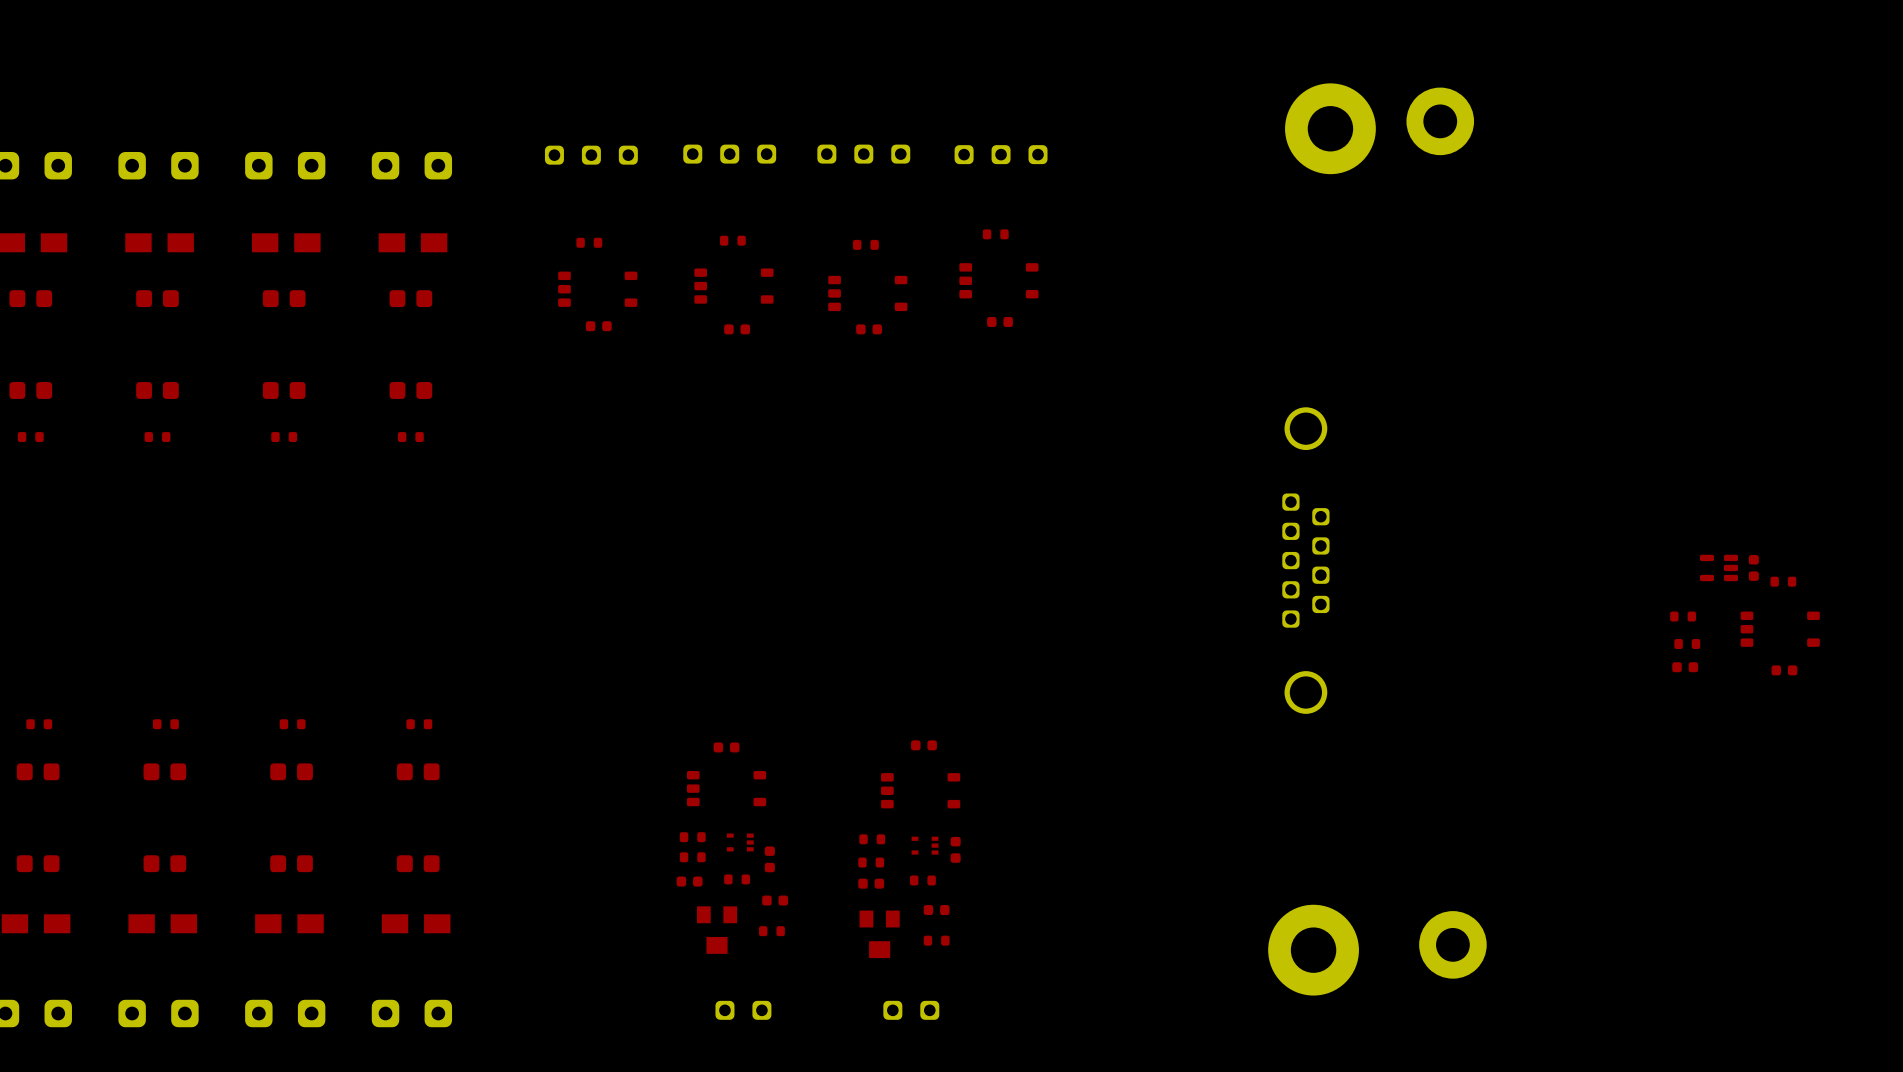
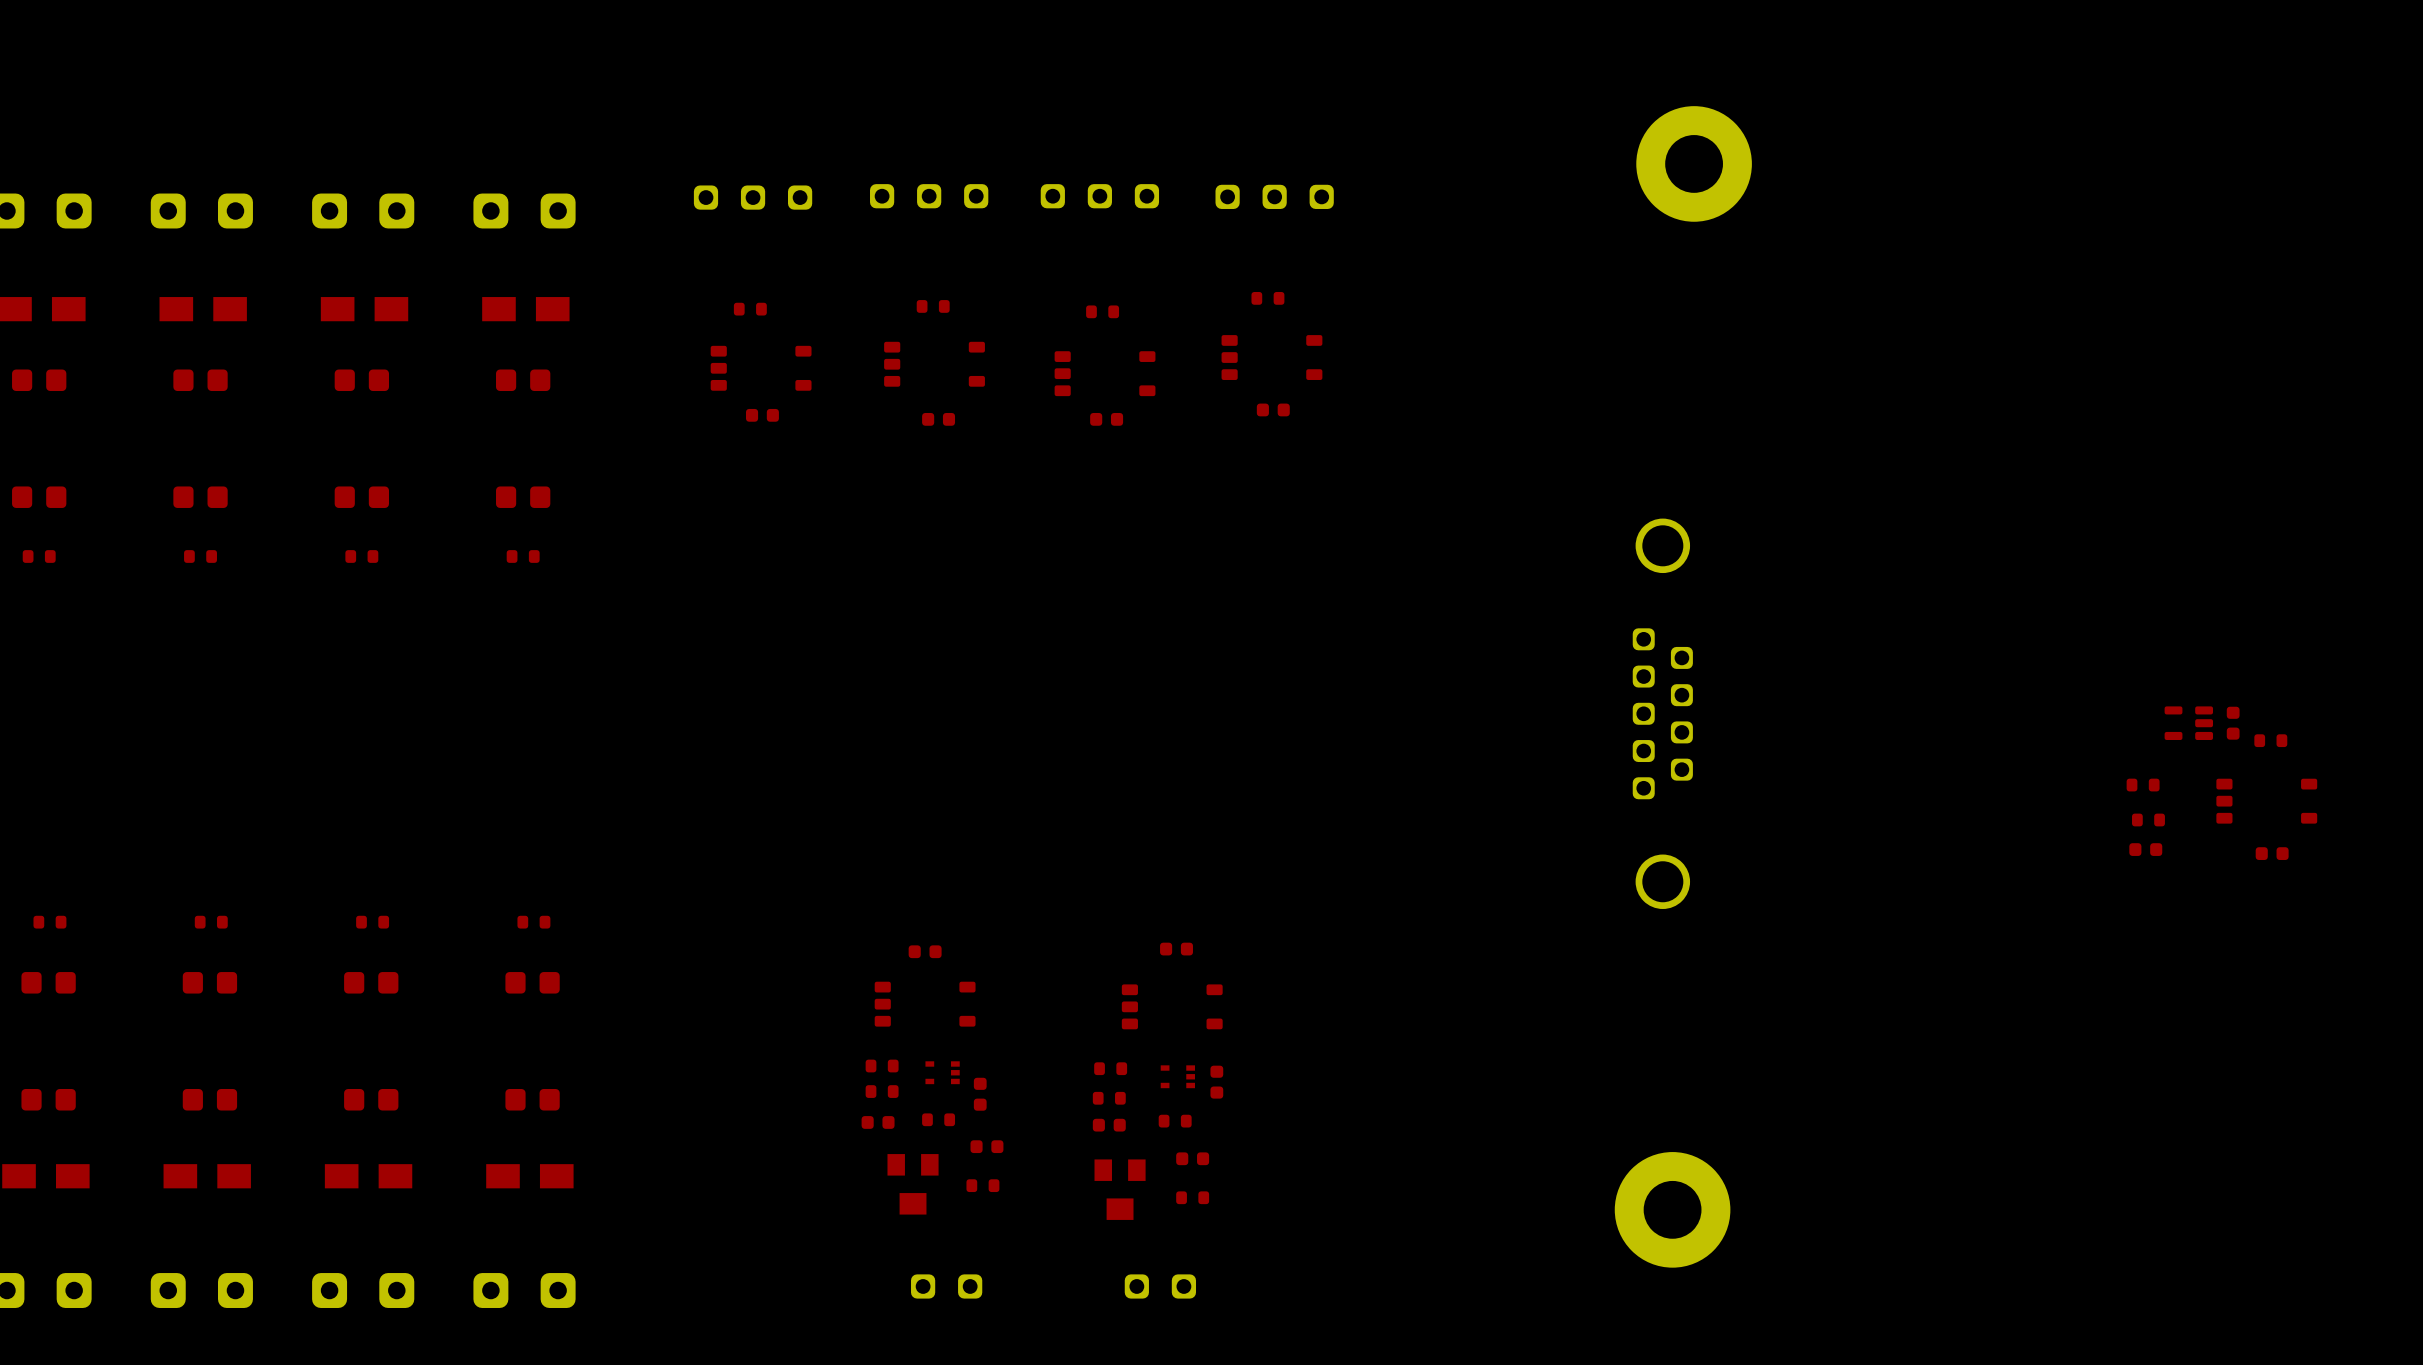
part: (1440, 121) -> none
part: (1452, 944) -> none

